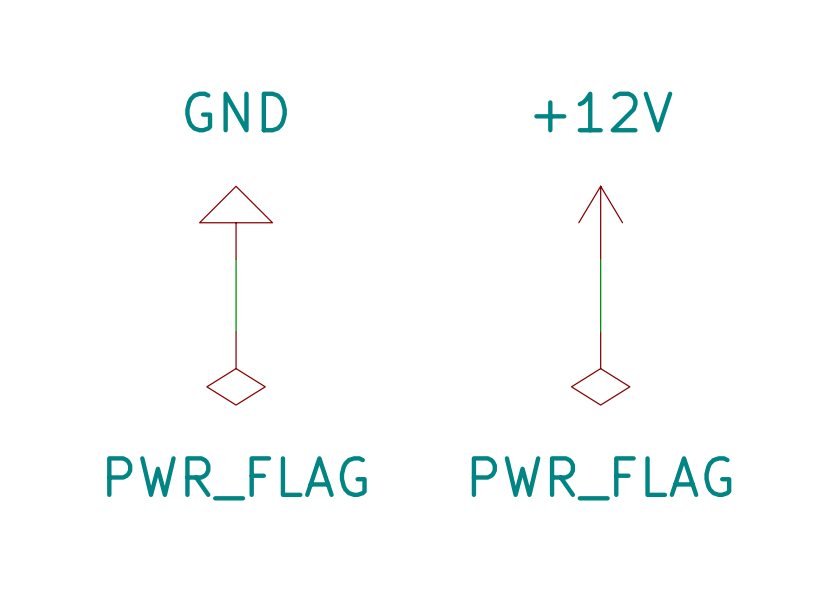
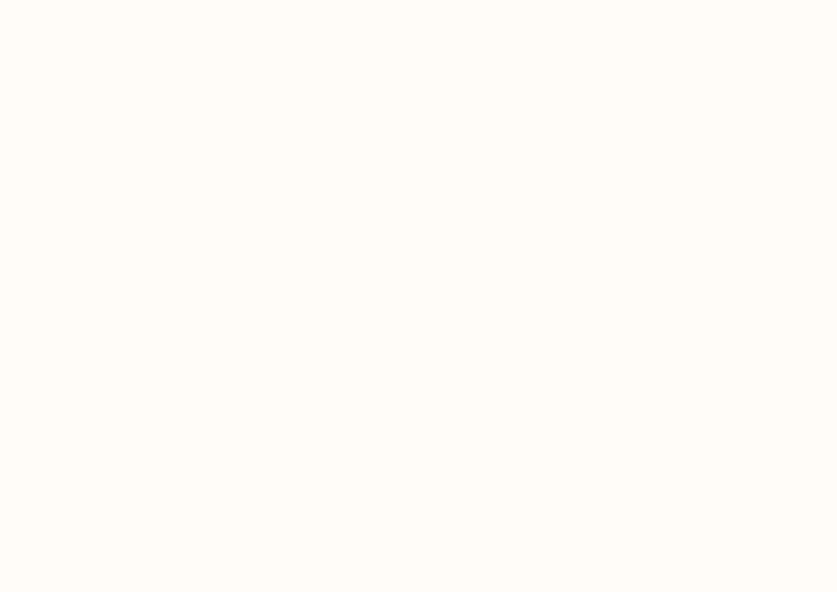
power symbol: GND (236, 222) -> none
power symbol: +12V (600, 222) -> none
wire: (236, 259) (236, 332) -> none
wire: (600, 259) (600, 332) -> none
power symbol: PWR_FLAG (236, 368) -> none
power symbol: PWR_FLAG (600, 368) -> none

